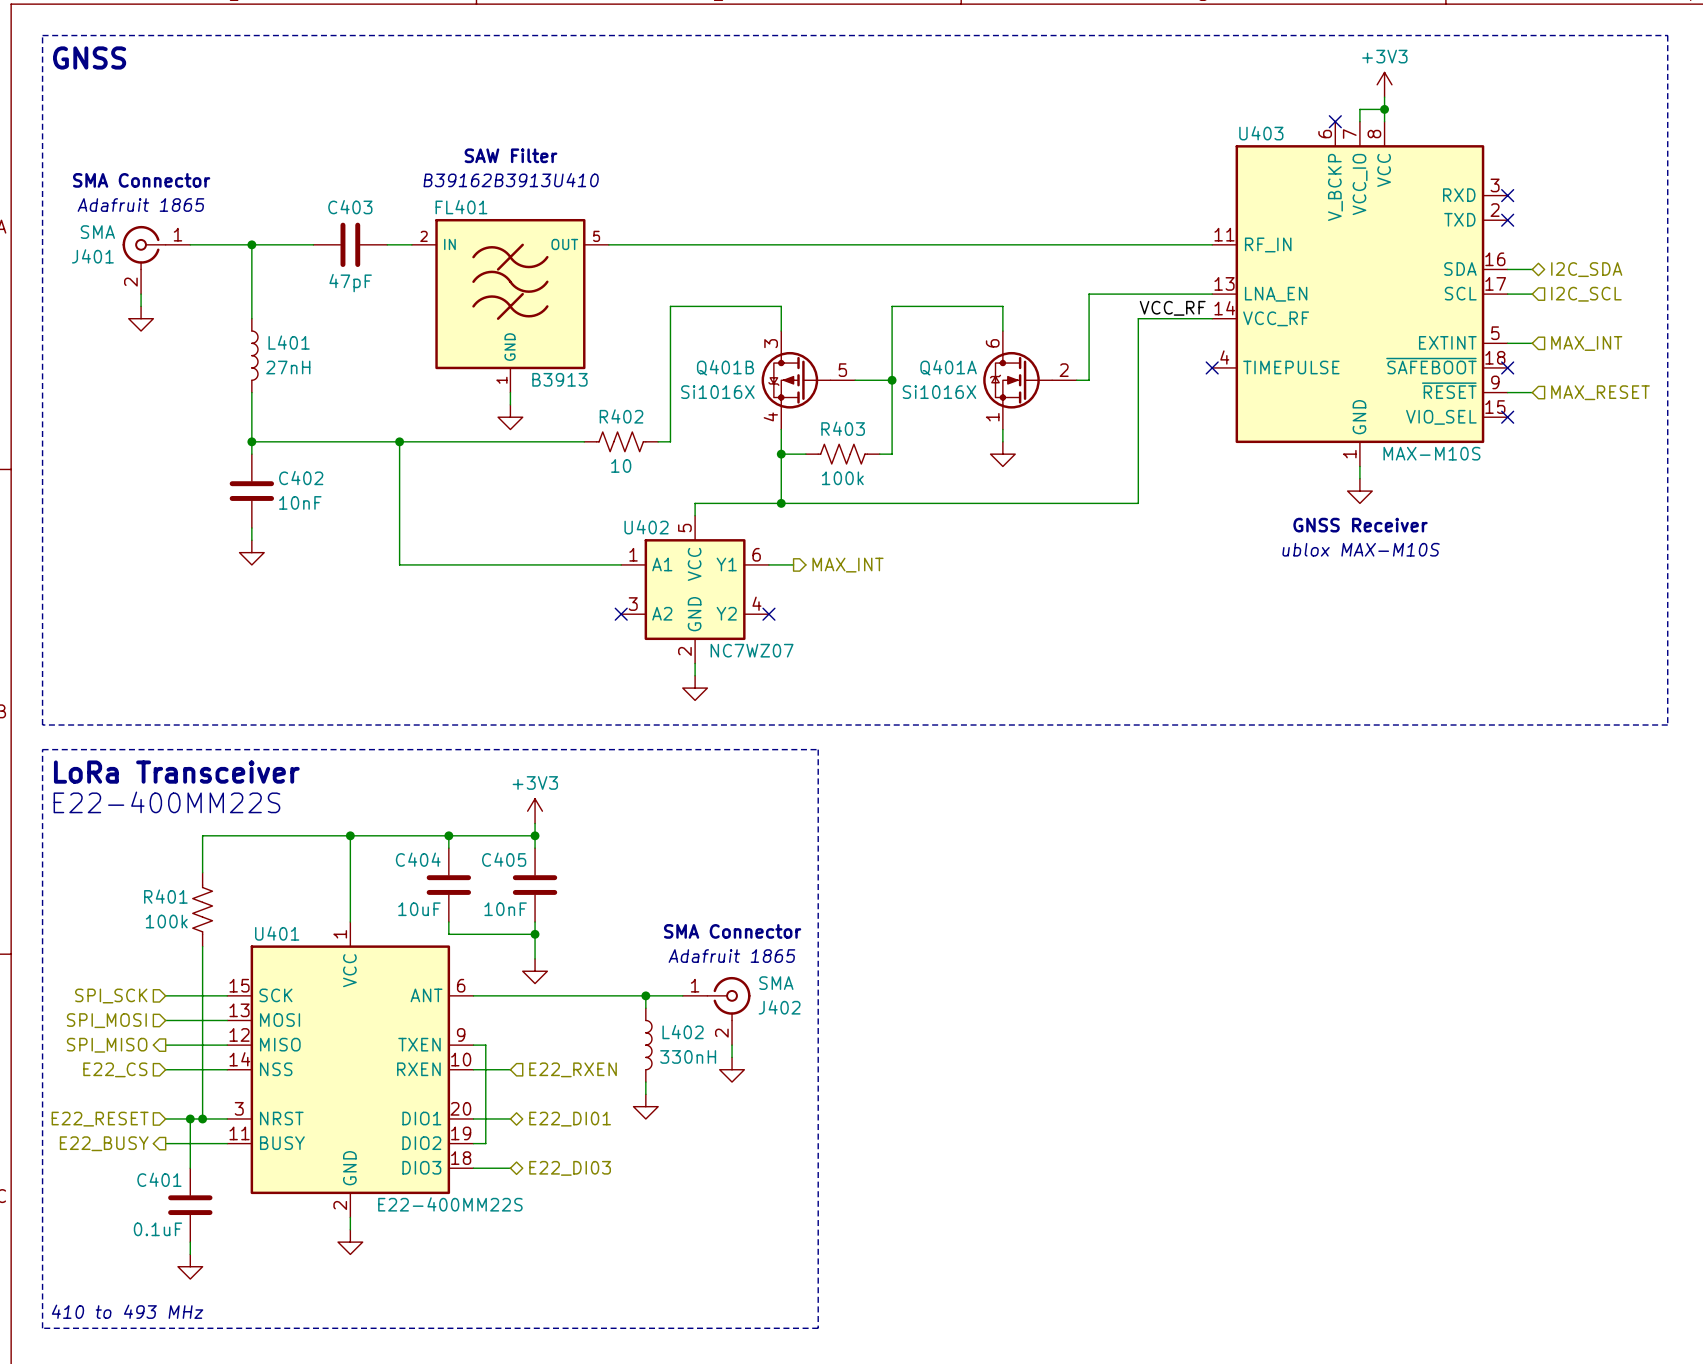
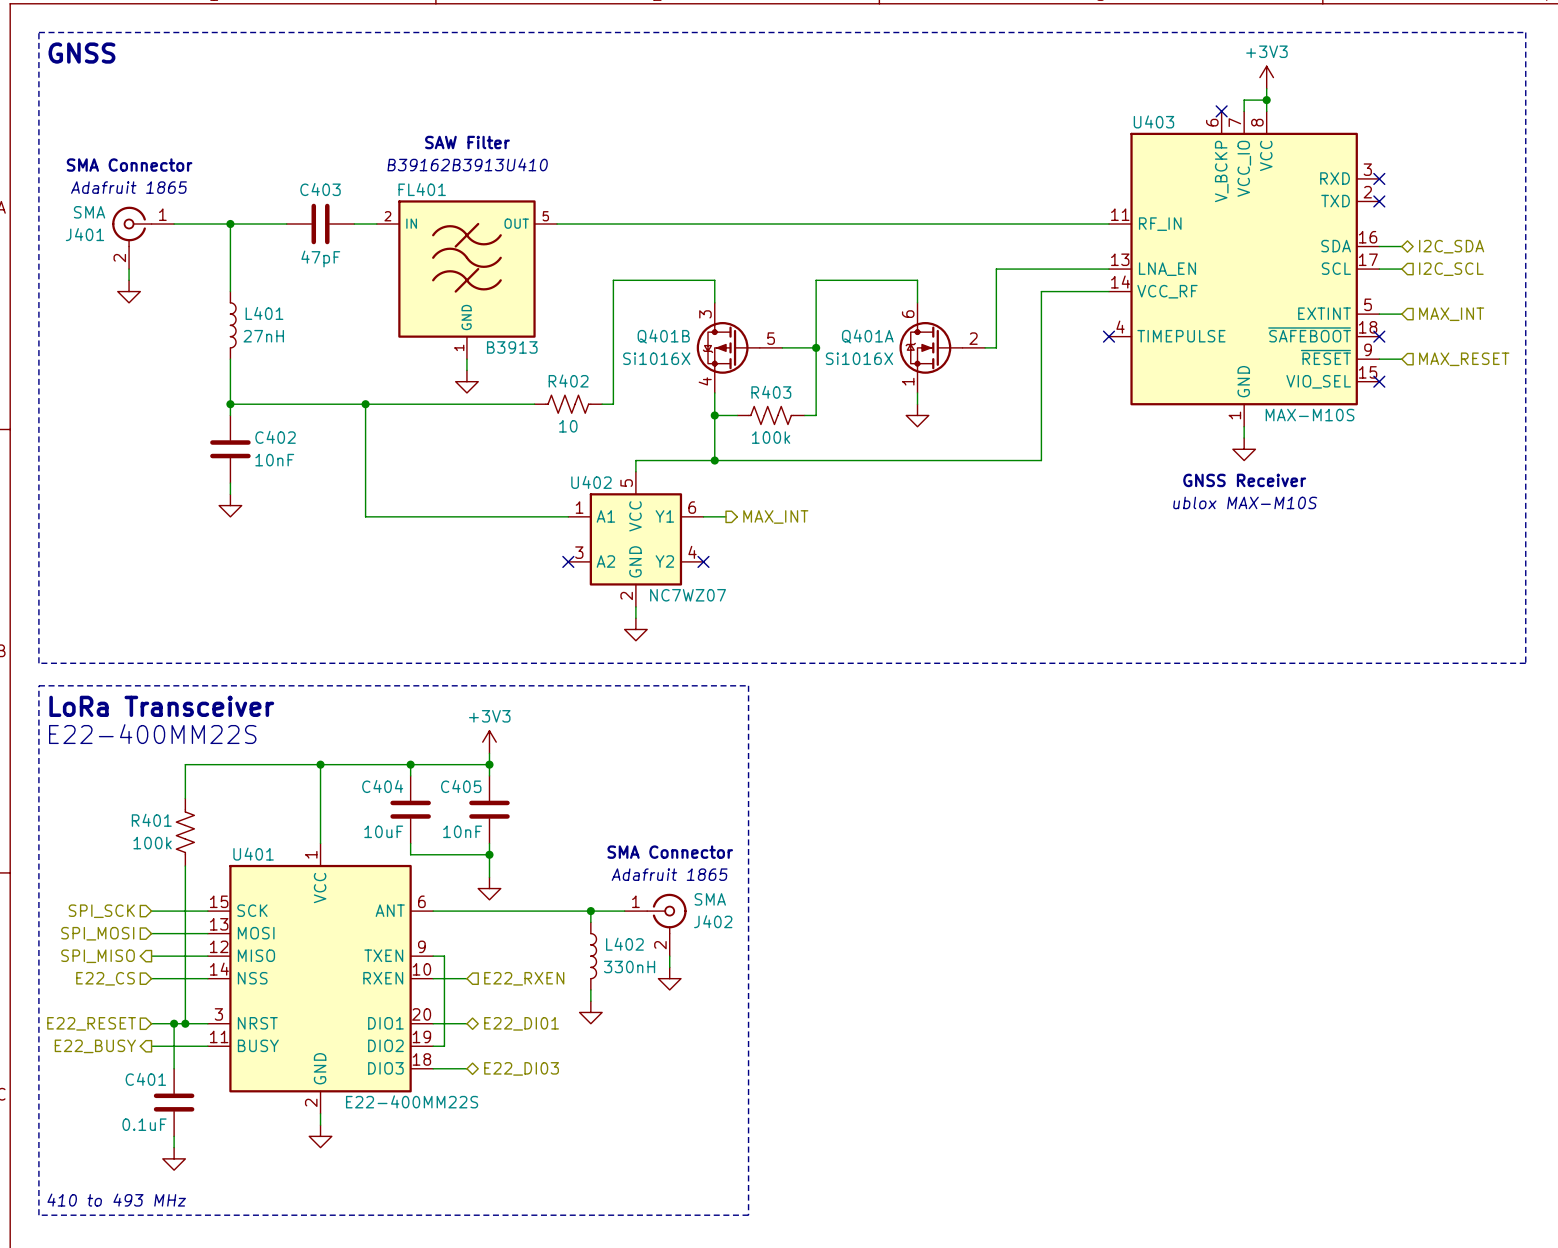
label: VCC_RF (1172, 308) -> none

